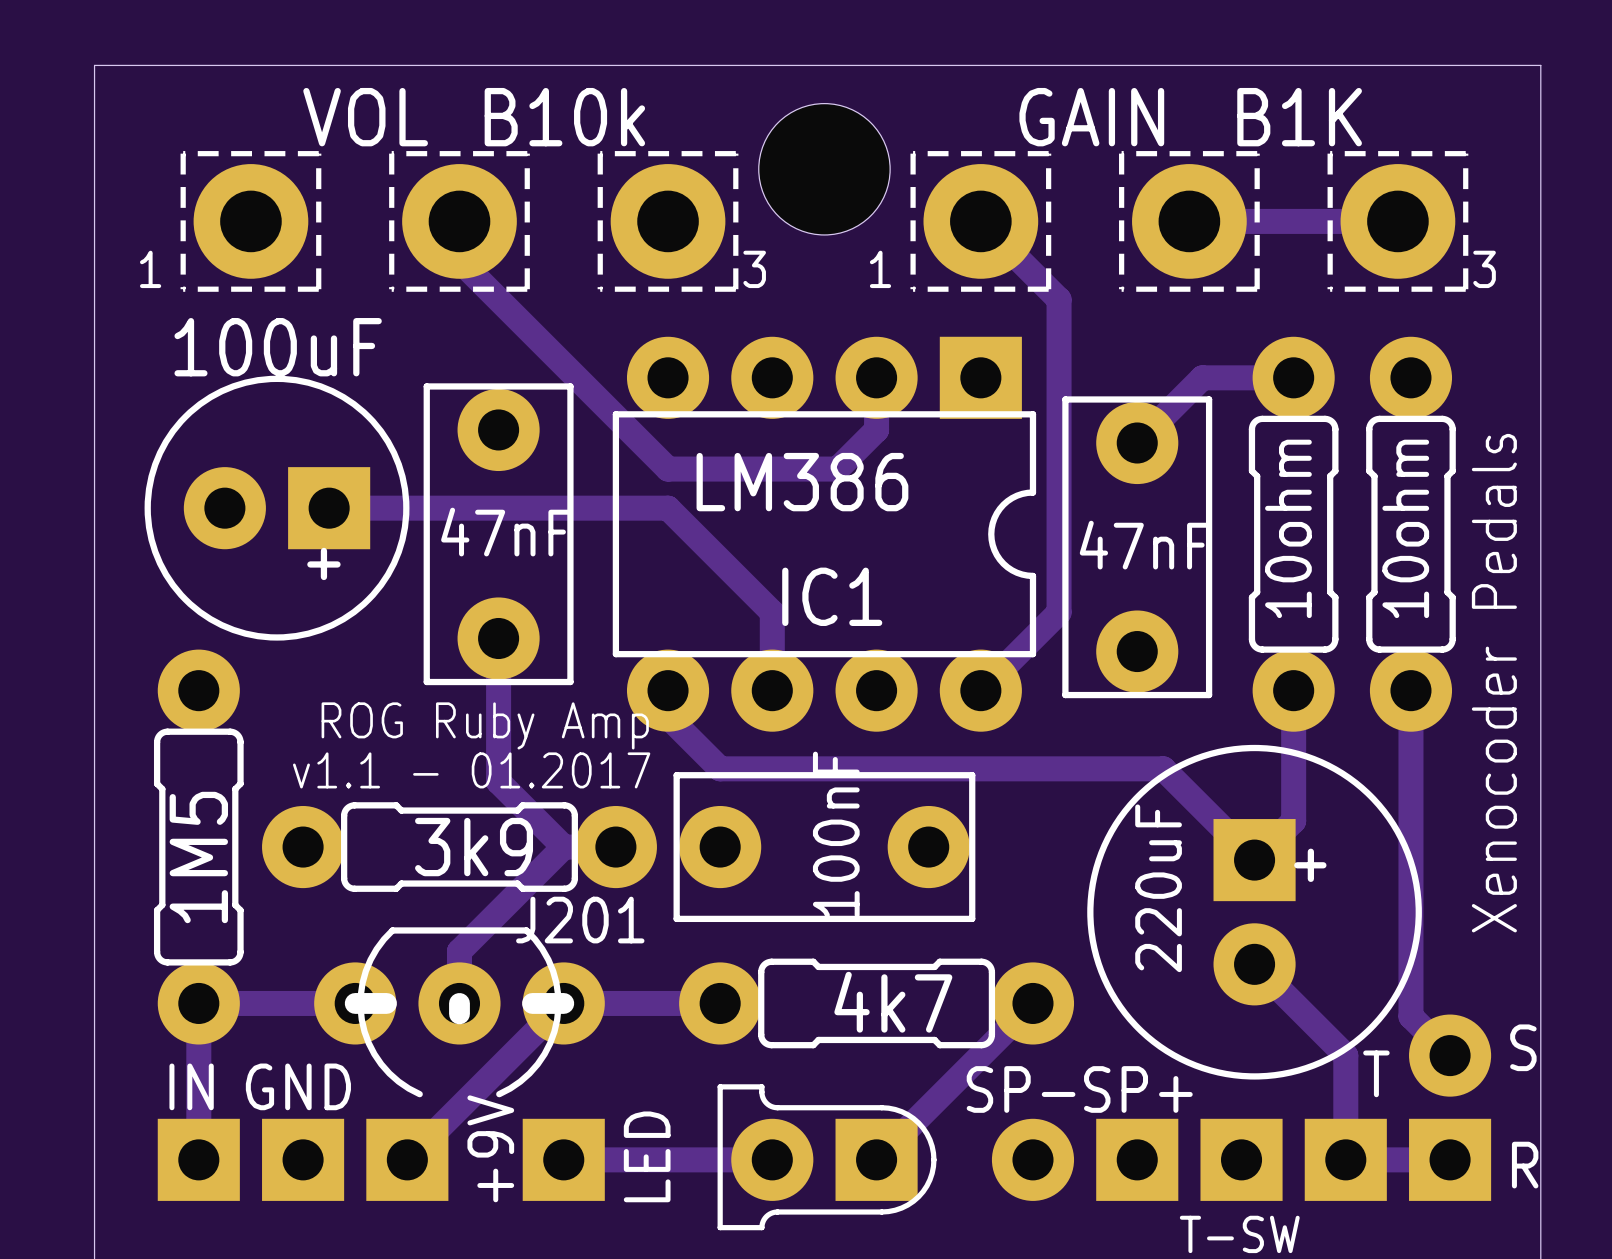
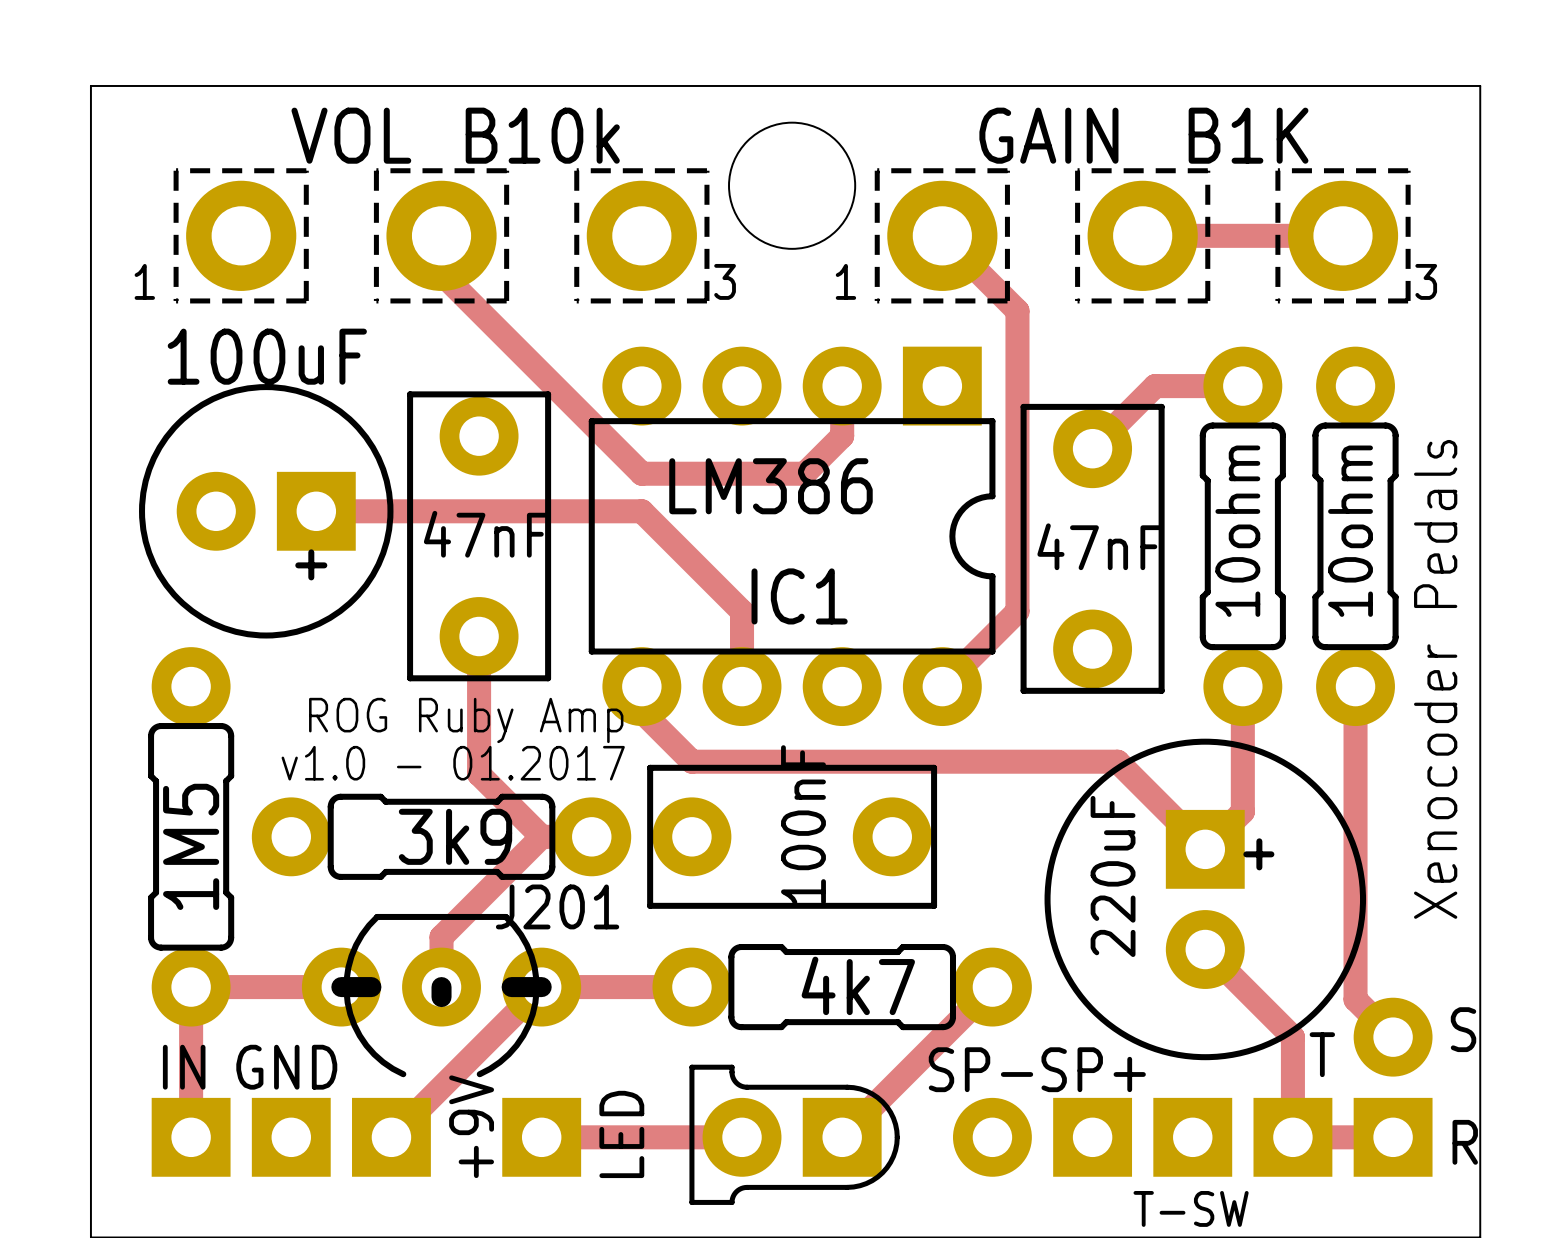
text: v1.1 - 01.2017 (471, 770) -> v1.0 - 01.2017 (453, 763)

